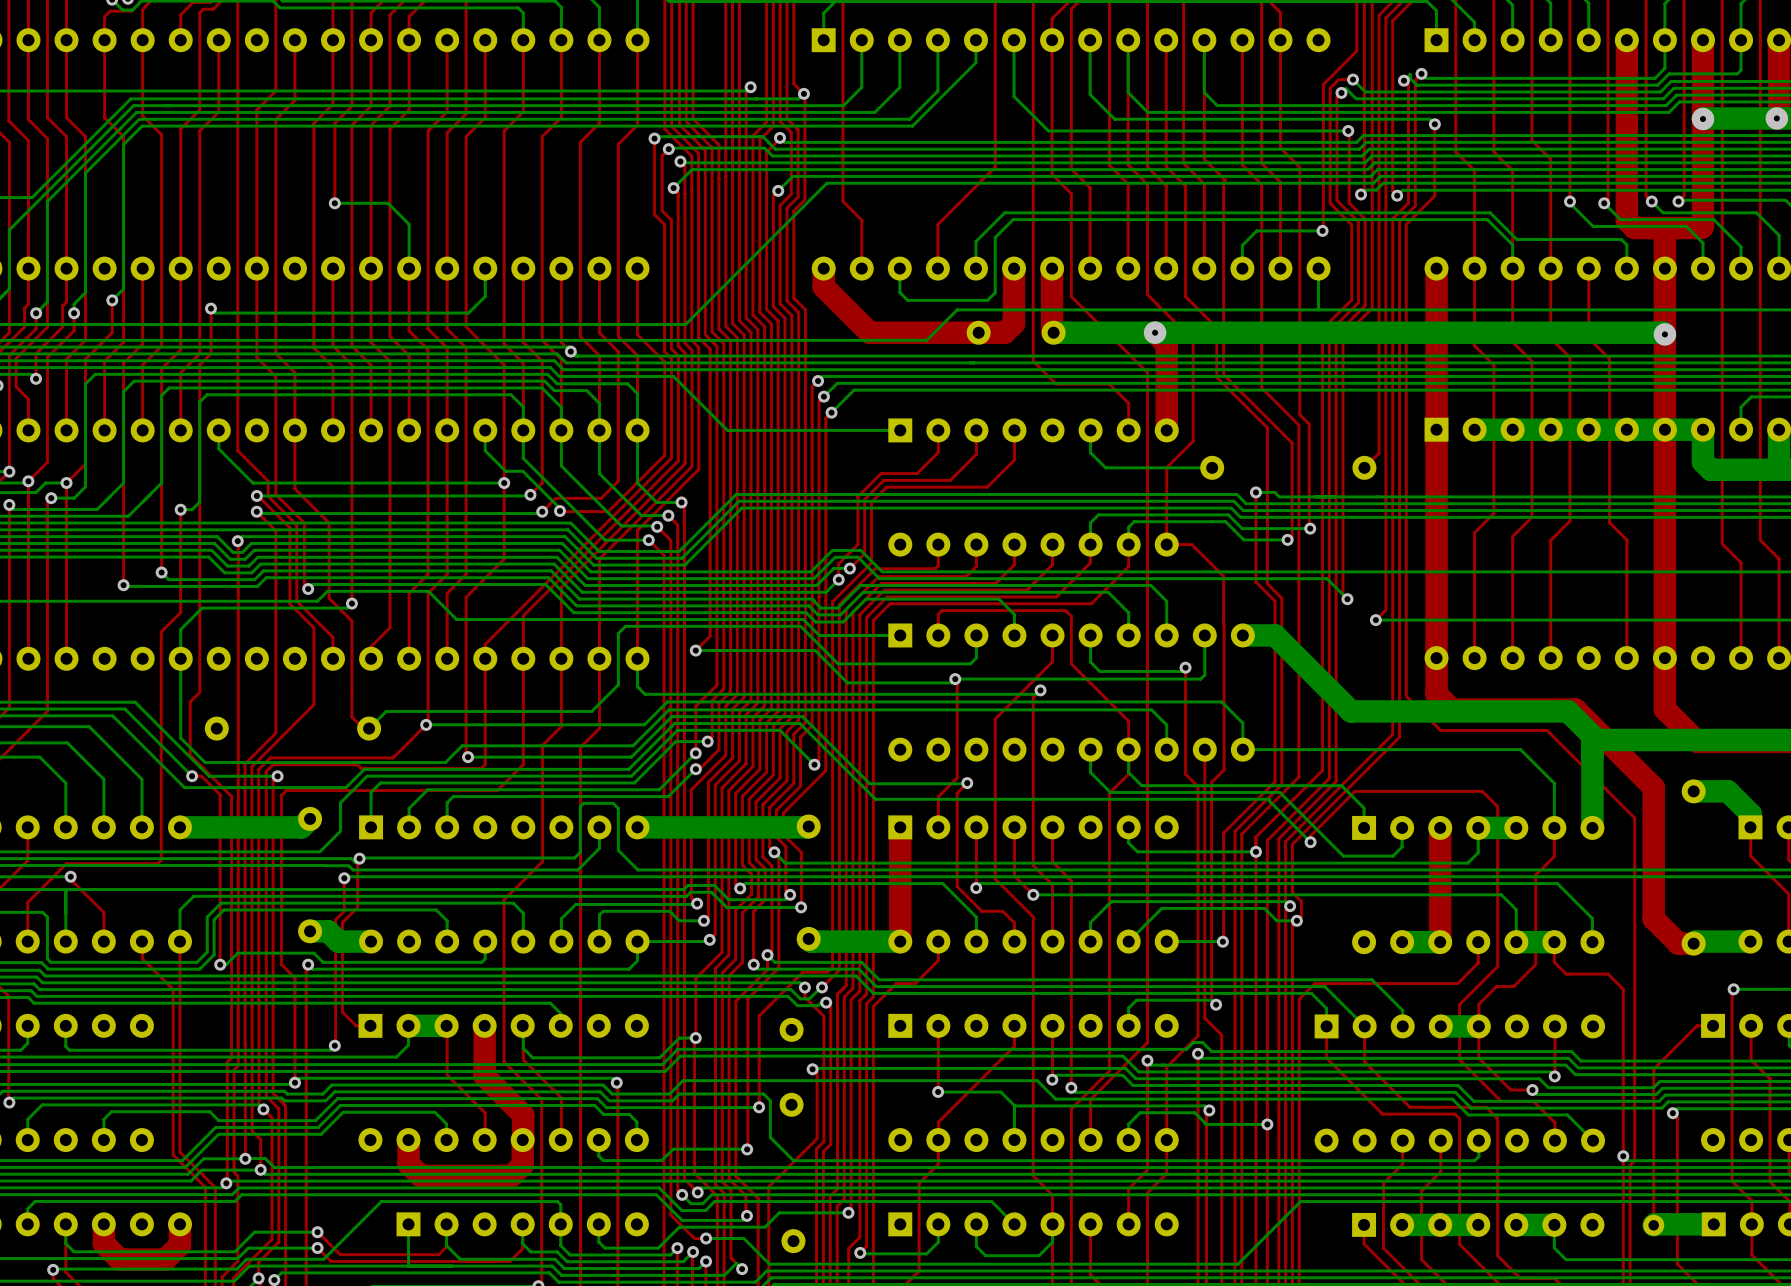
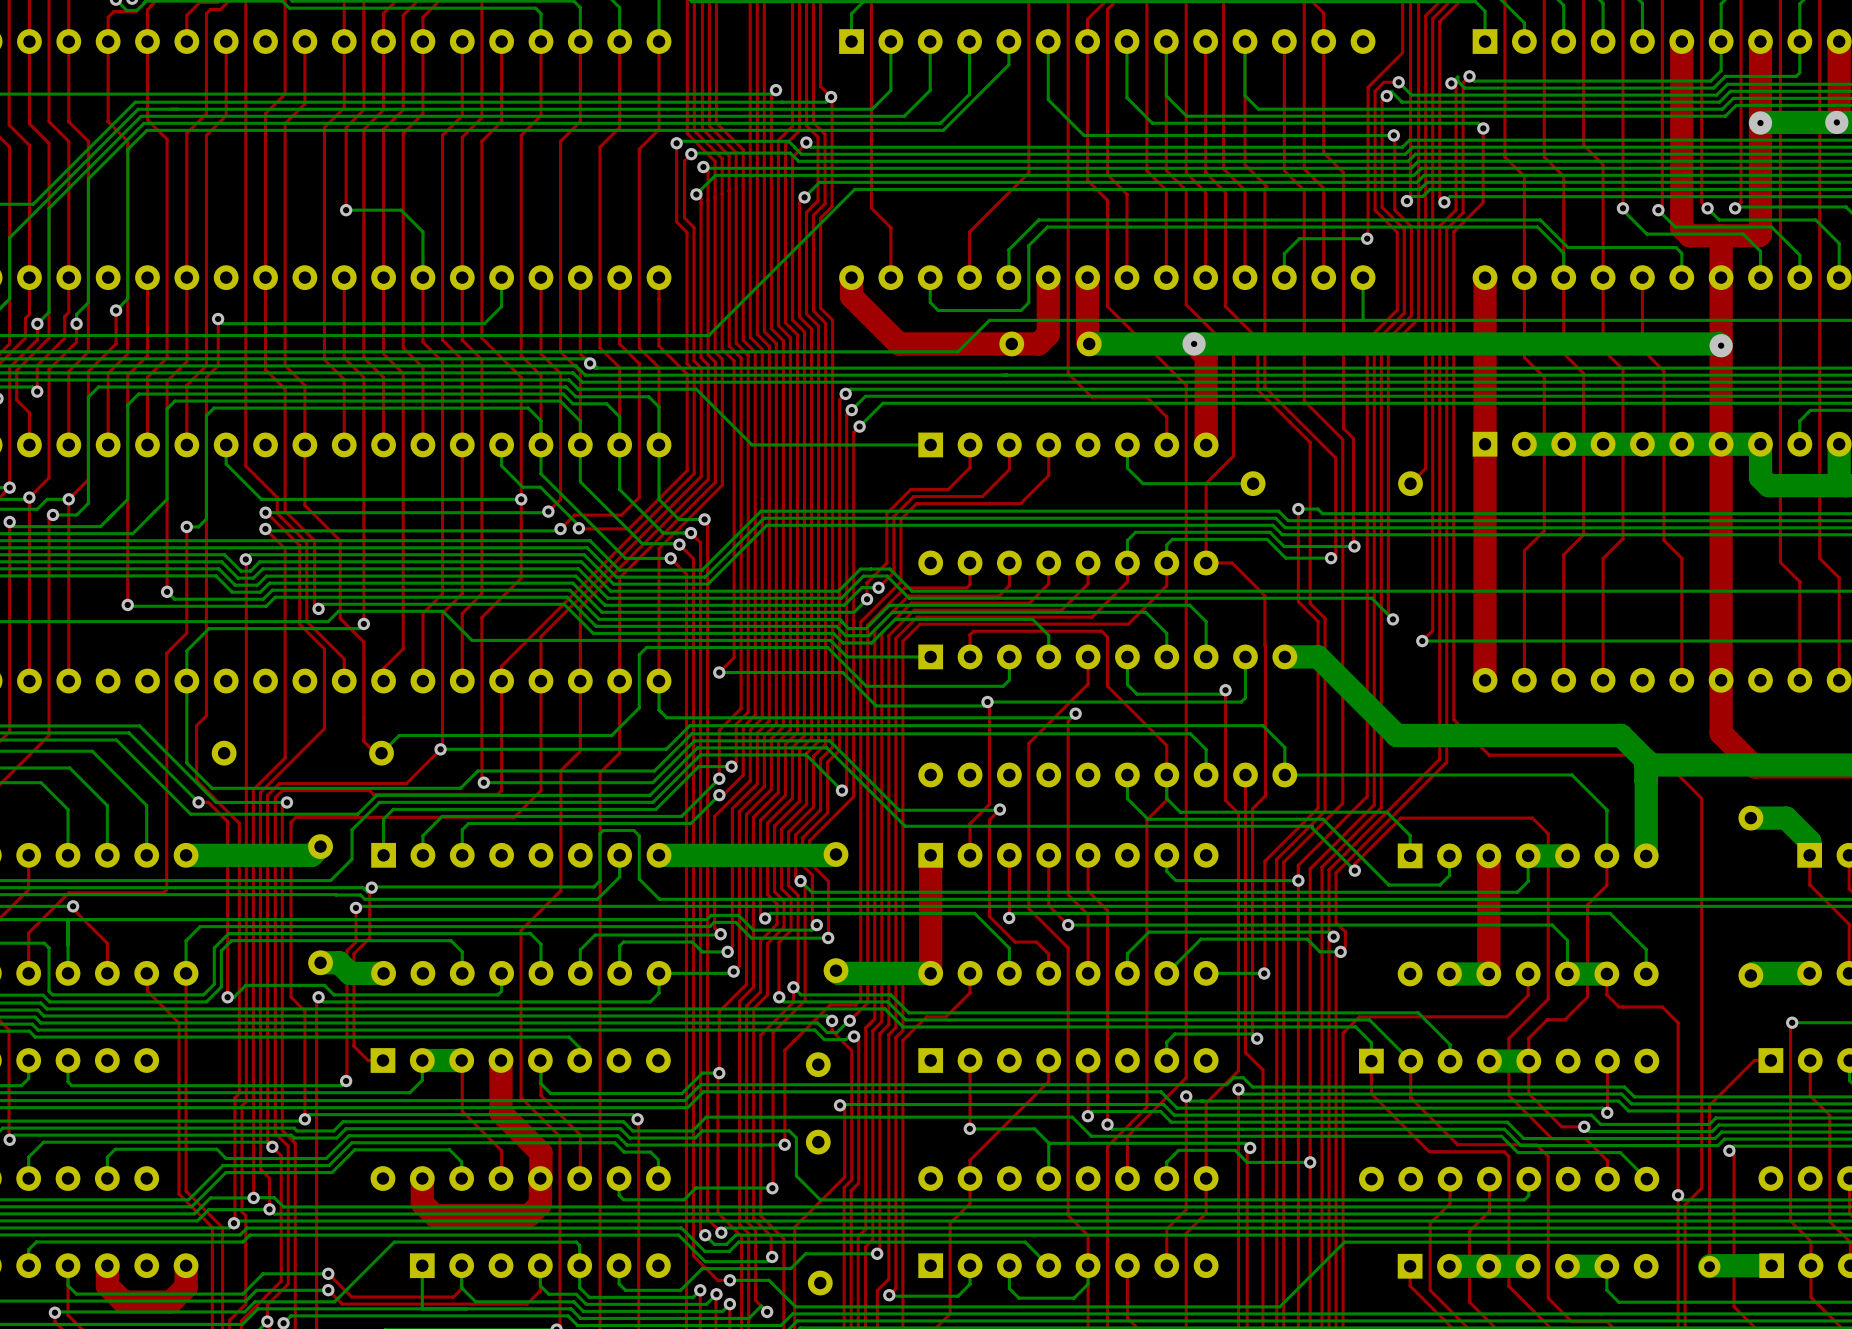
top track: (1436, 658) (1436, 694) (1451, 709) (1575, 709) (1653, 787) (1653, 918) (1678, 943) (1693, 943) -> none
top track: (1547, 730) (1634, 818) (1634, 1160) -> (1599, 755) (1658, 755) (1701, 798) (1701, 1188) (1689, 1199)

